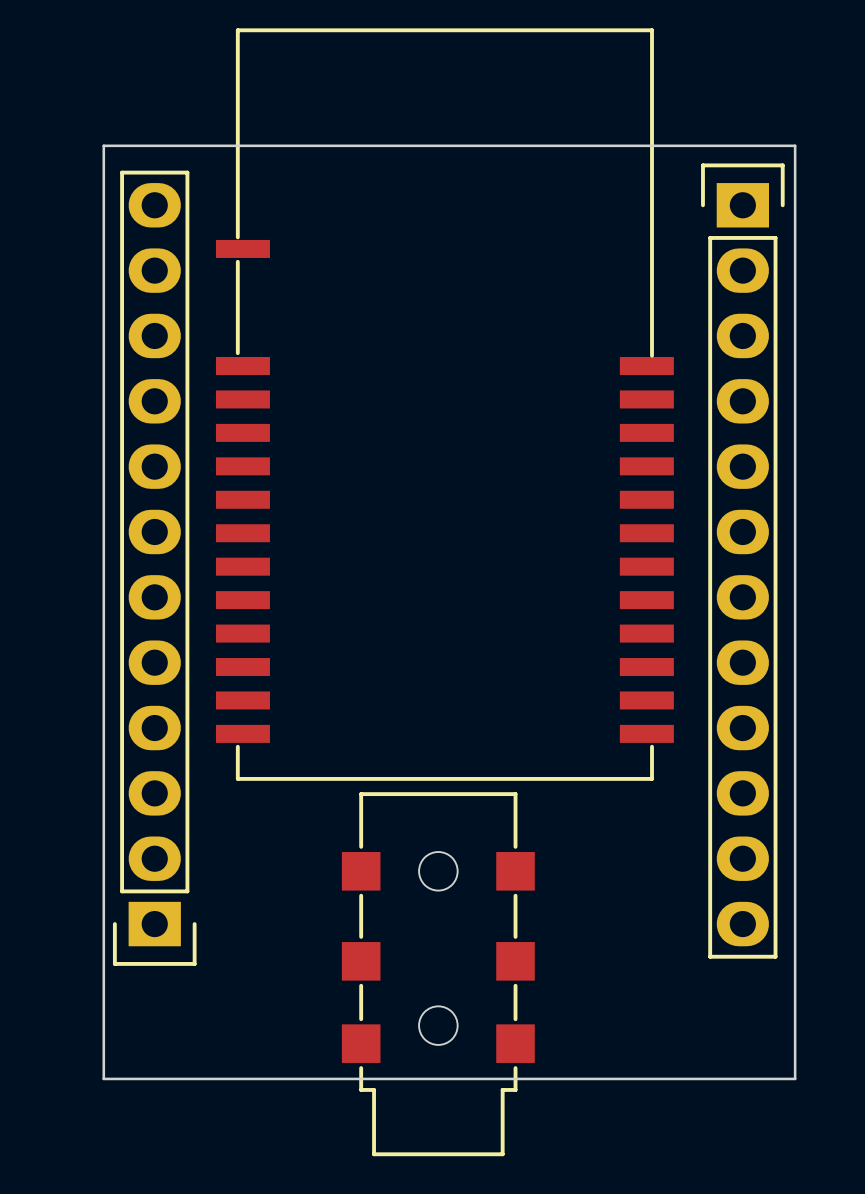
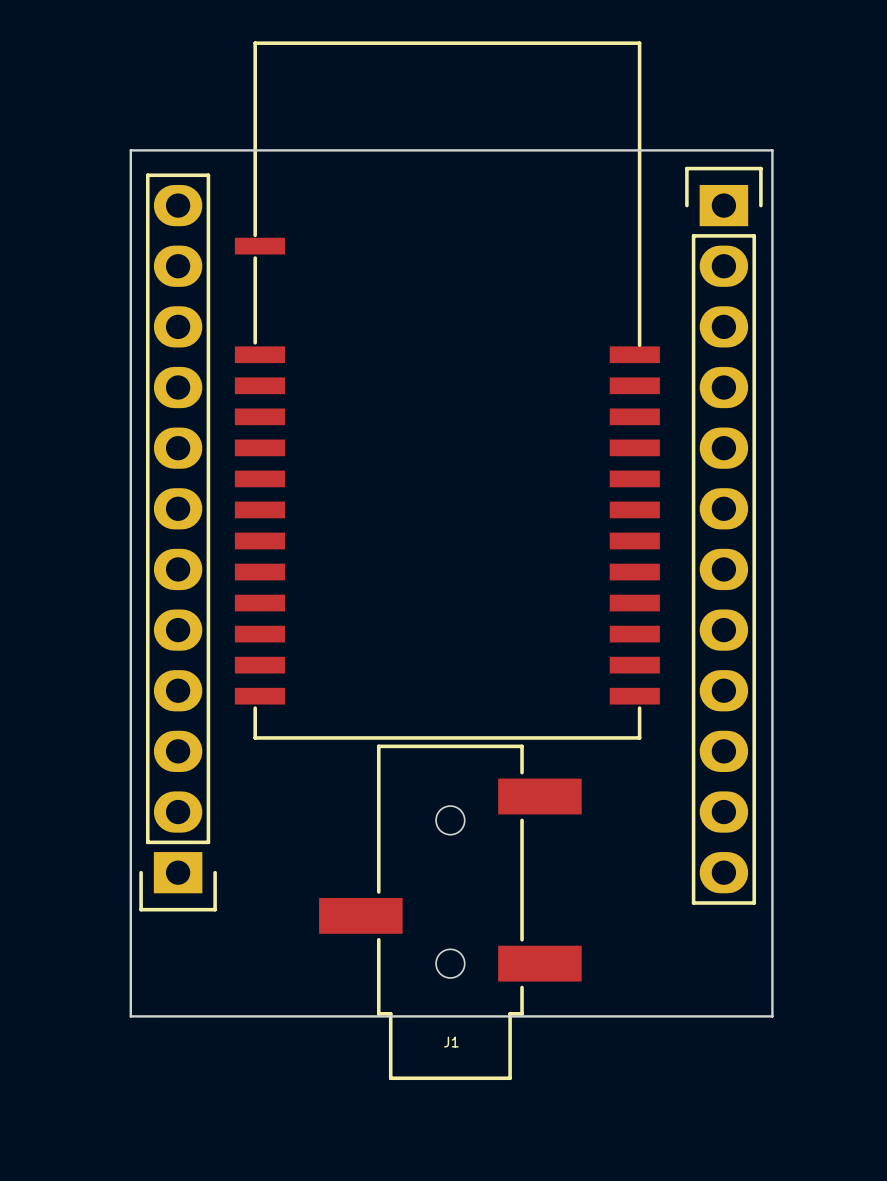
J1: none -> (450, 912)
part: (438, 974) -> none

